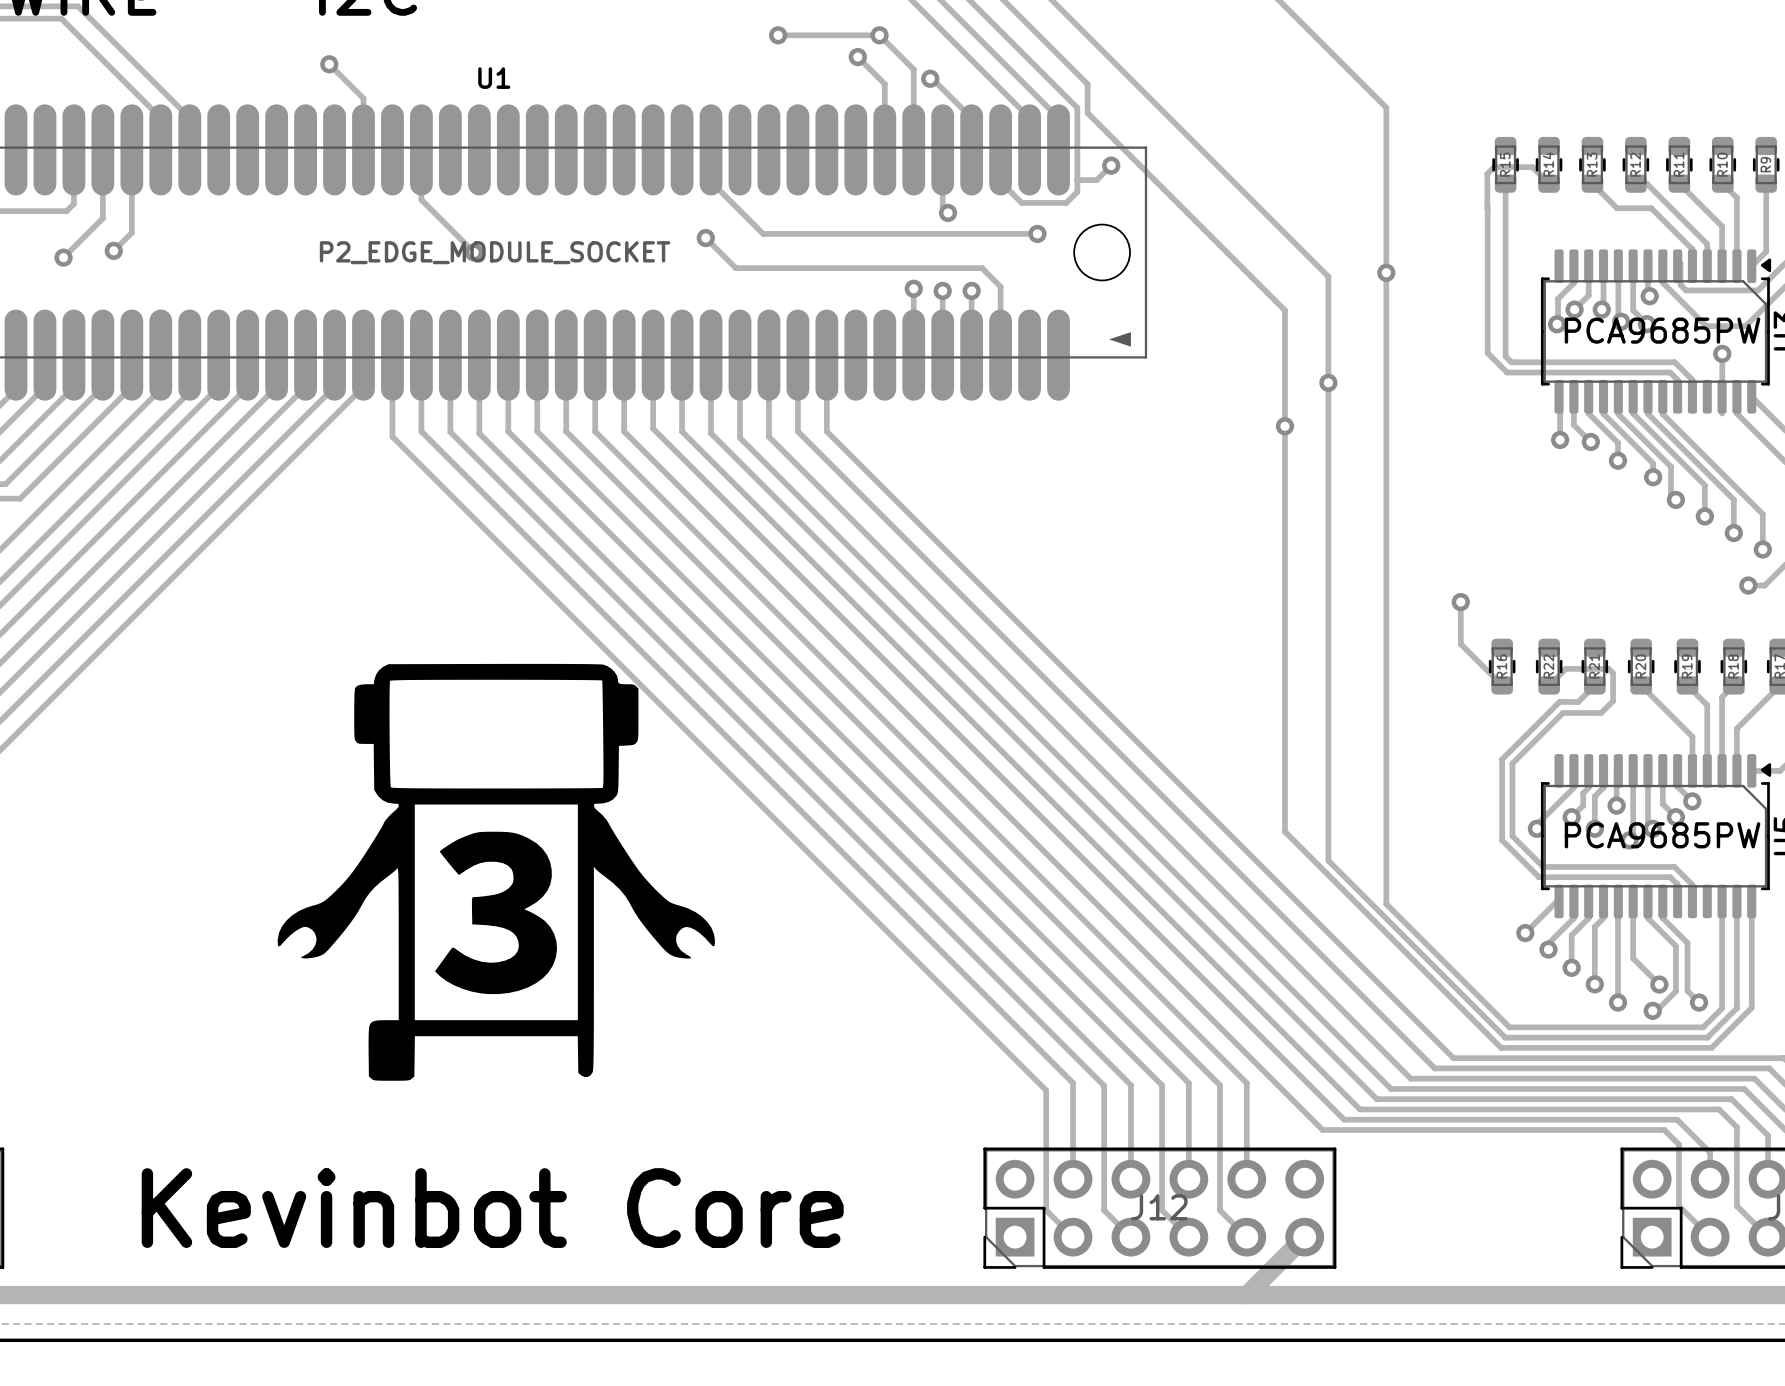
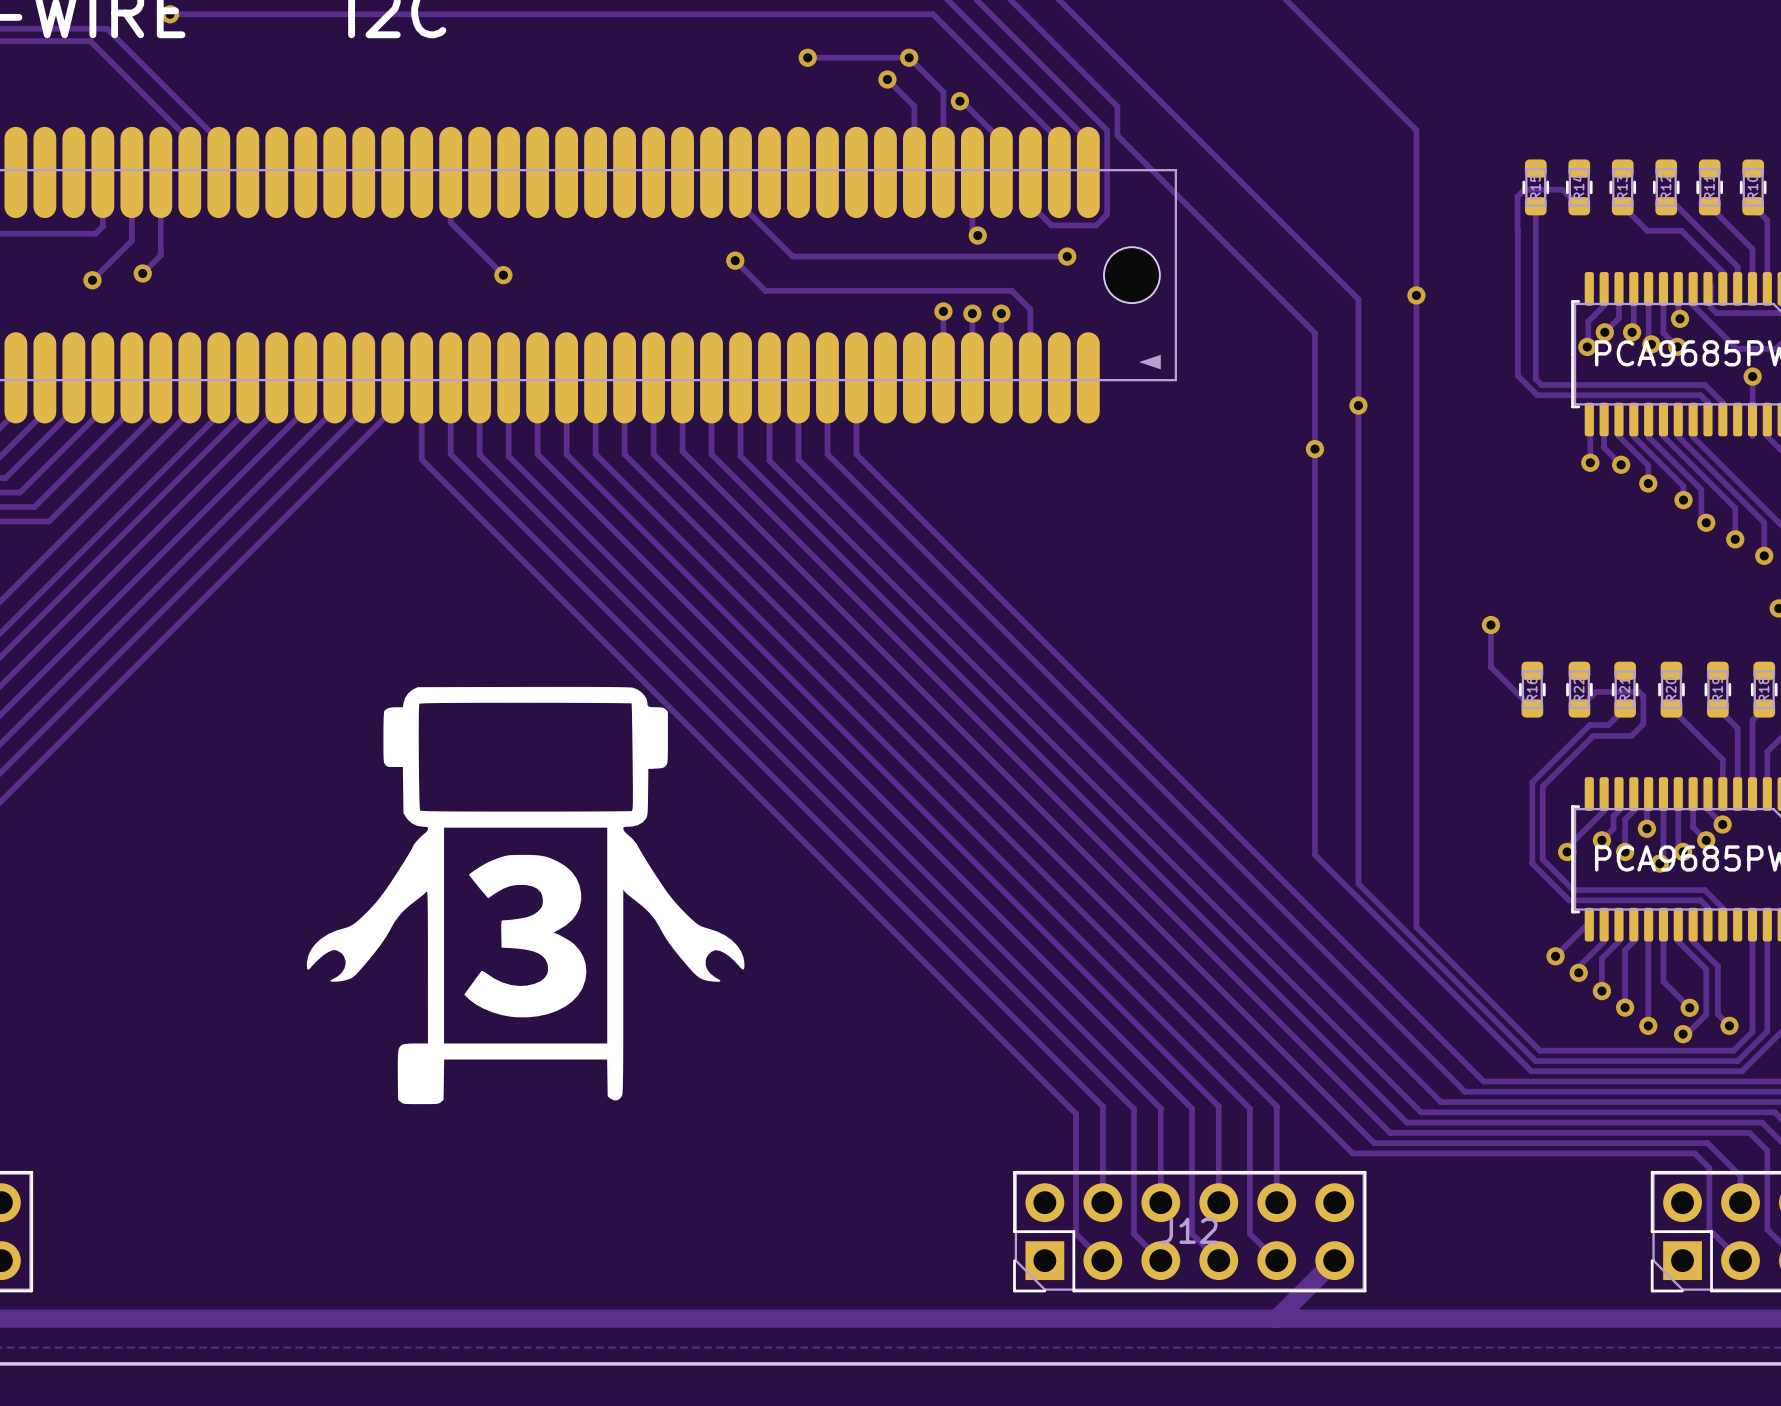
track: (329, 64) (363, 98) (363, 149) -> none
via: (329, 64) -> none
U1 name: U1 (494, 78) -> none
track: (1111, 165) (1096, 180) (1077, 180) -> none
via: (1111, 165) -> none
U1 value: P2_EDGE_MODULE_SOCKET (495, 252) -> none
text: Kevinbot Core (492, 1208) -> none

